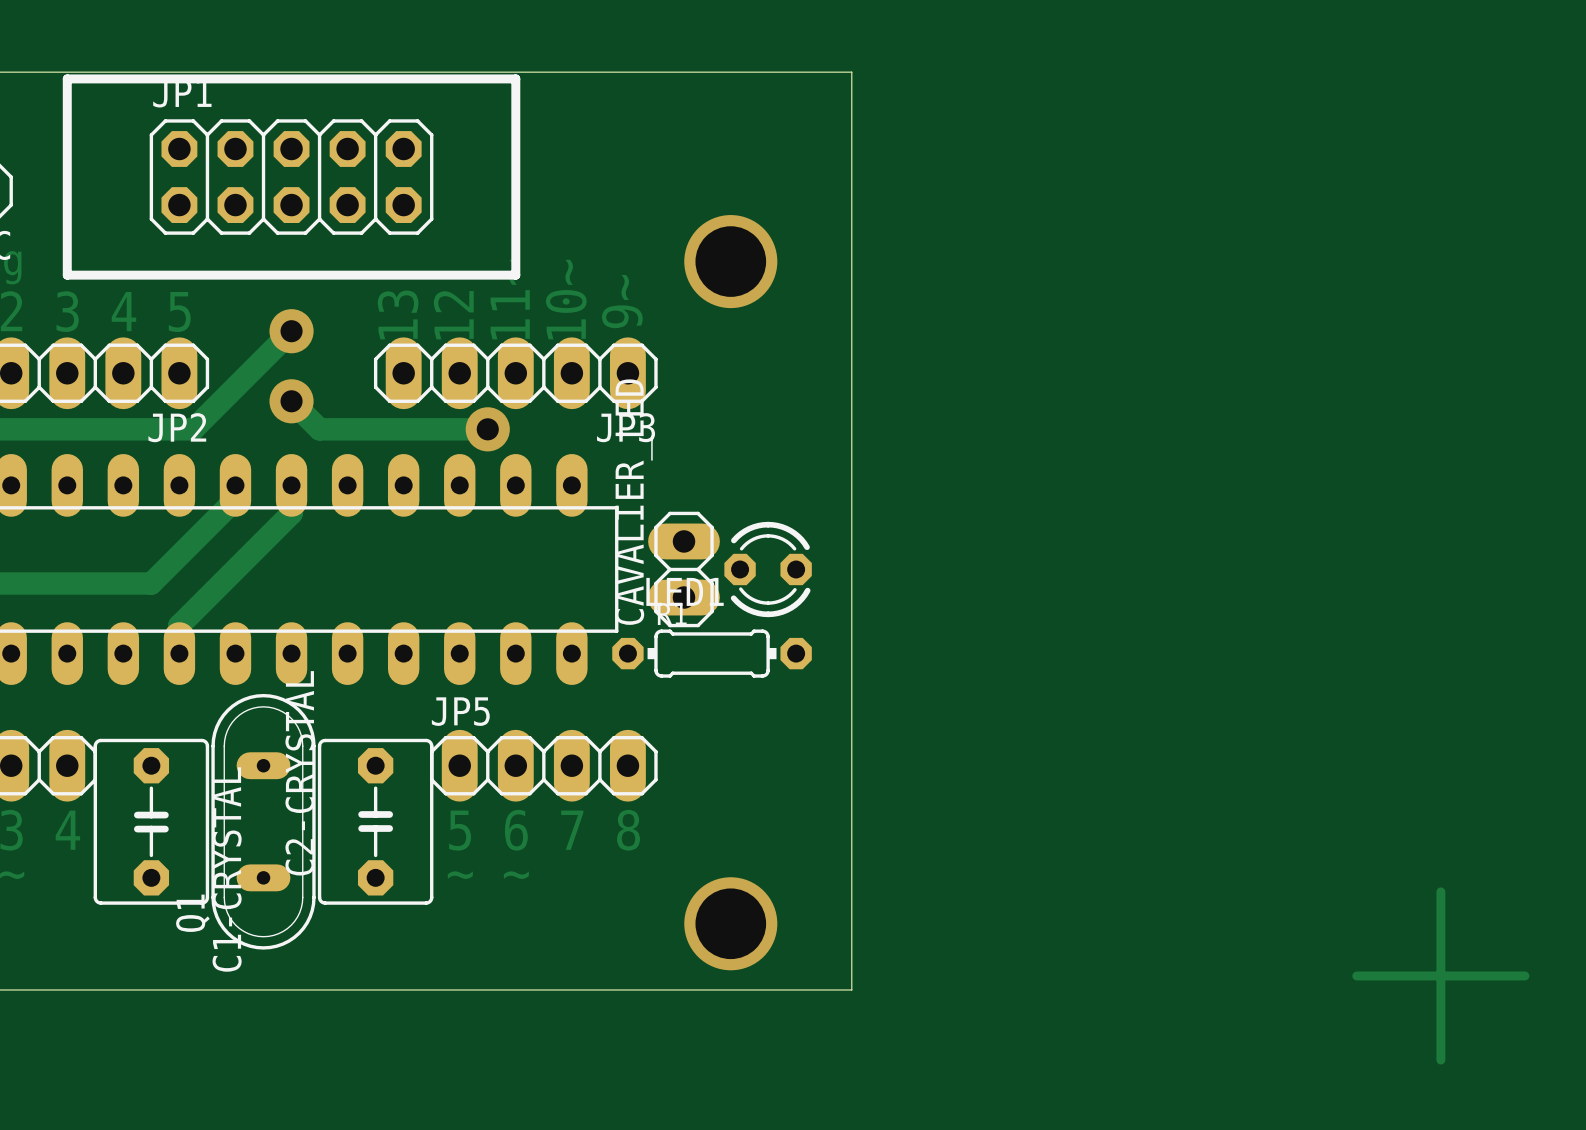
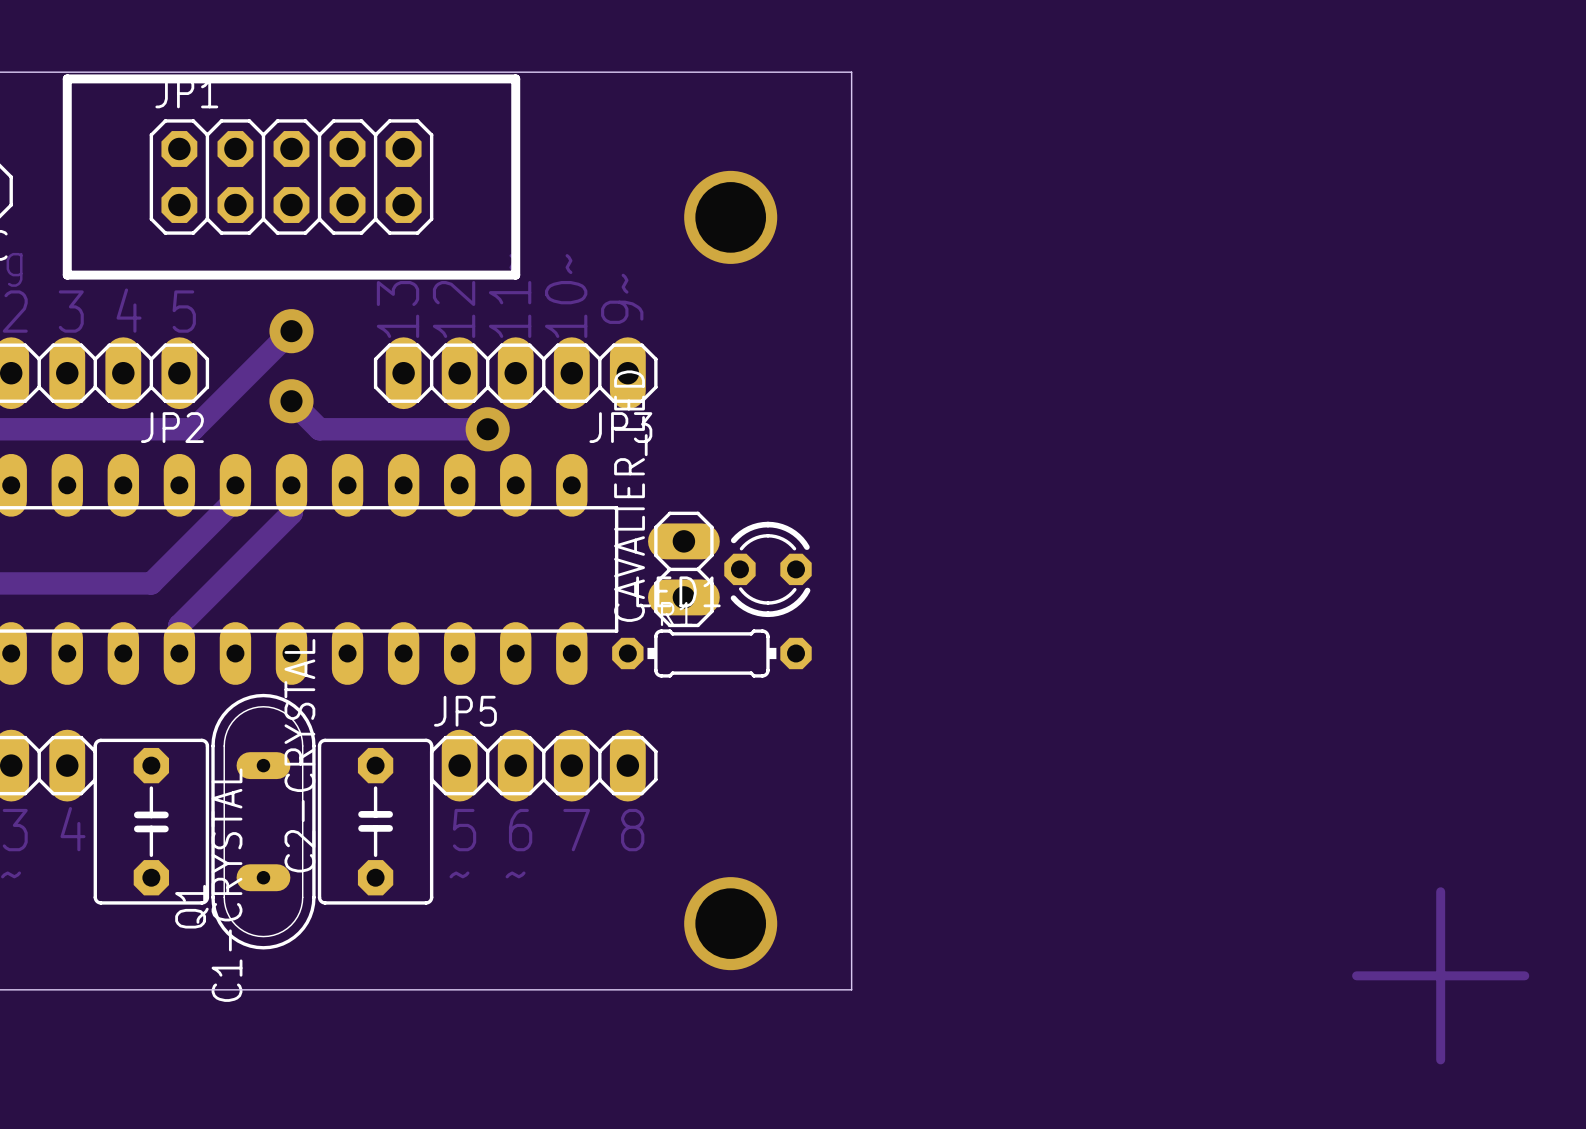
via position: (730, 261) -> (730, 217)

